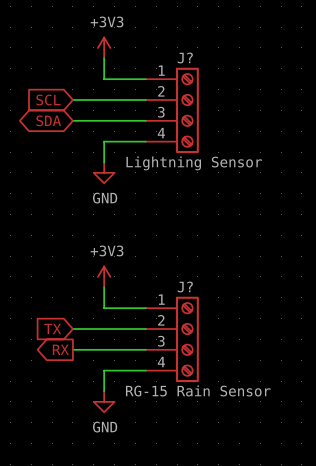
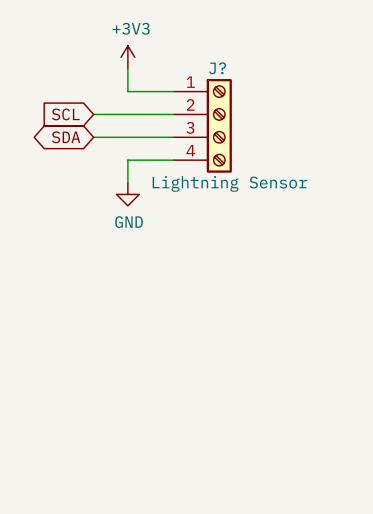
power symbol: +3V3 (104, 276) -> none
wire: (104, 287) (104, 308) (145, 308) -> none
global label: TX (52, 328) -> none
wire: (72, 328) (145, 328) -> none
J?: RG-15 Rain Sensor (172, 339) -> none
global label: RX (60, 349) -> none
wire: (72, 349) (145, 349) -> none
wire: (145, 370) (104, 370) (104, 391) -> none
power symbol: GND (104, 401) -> none

